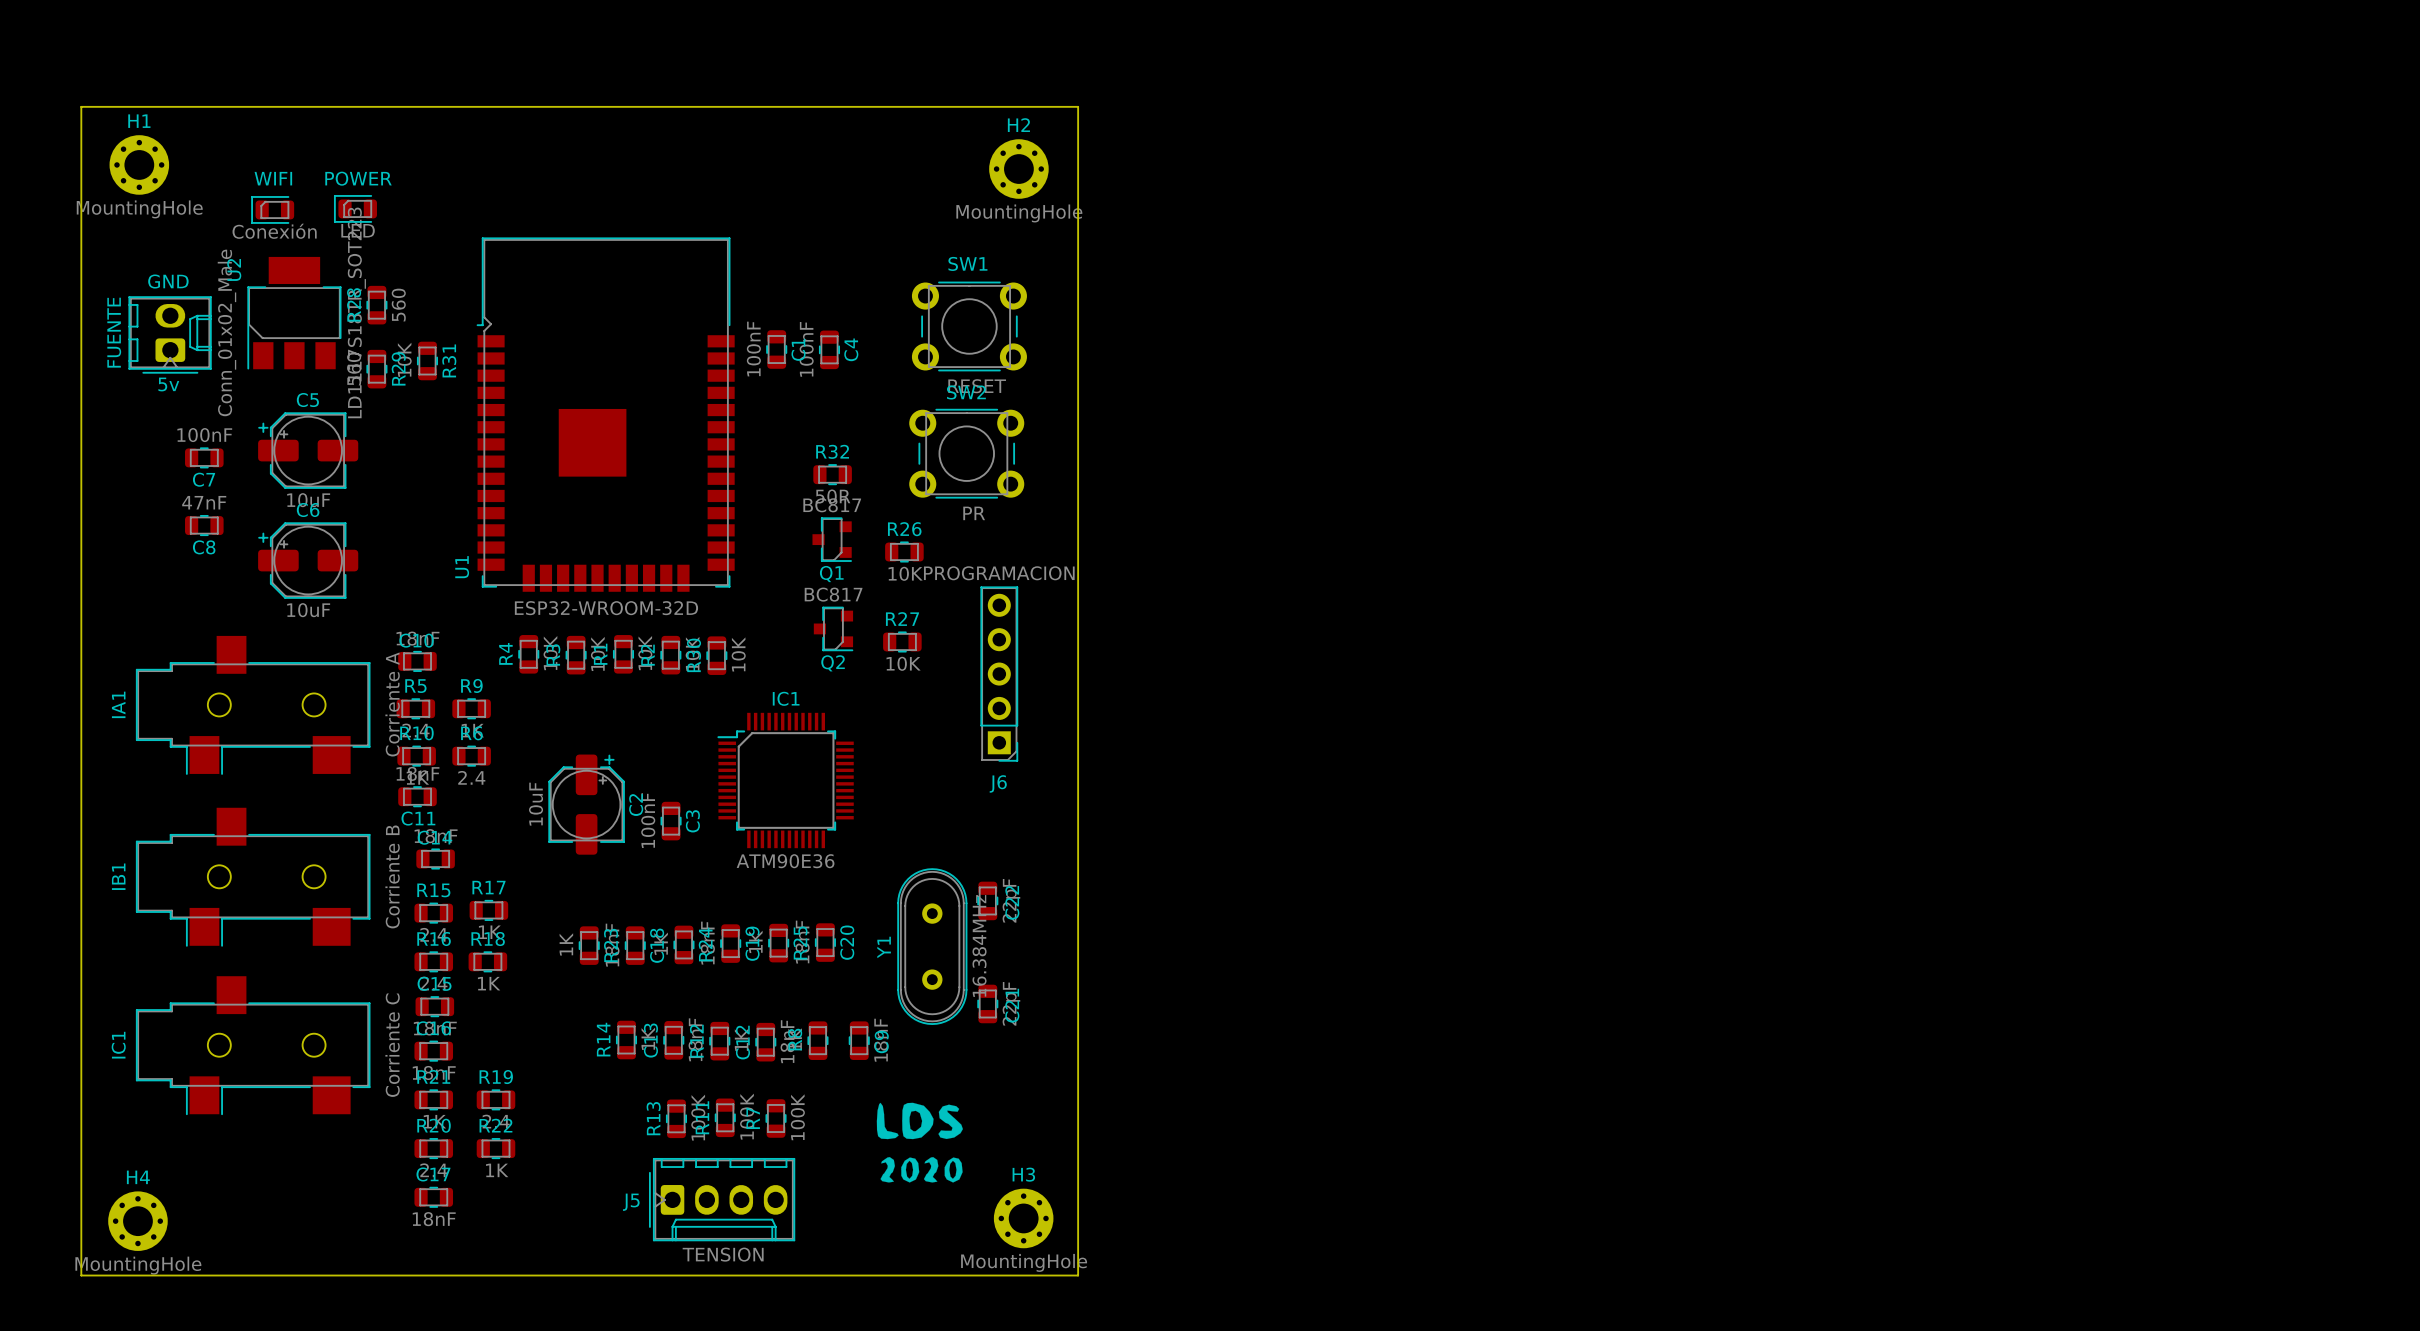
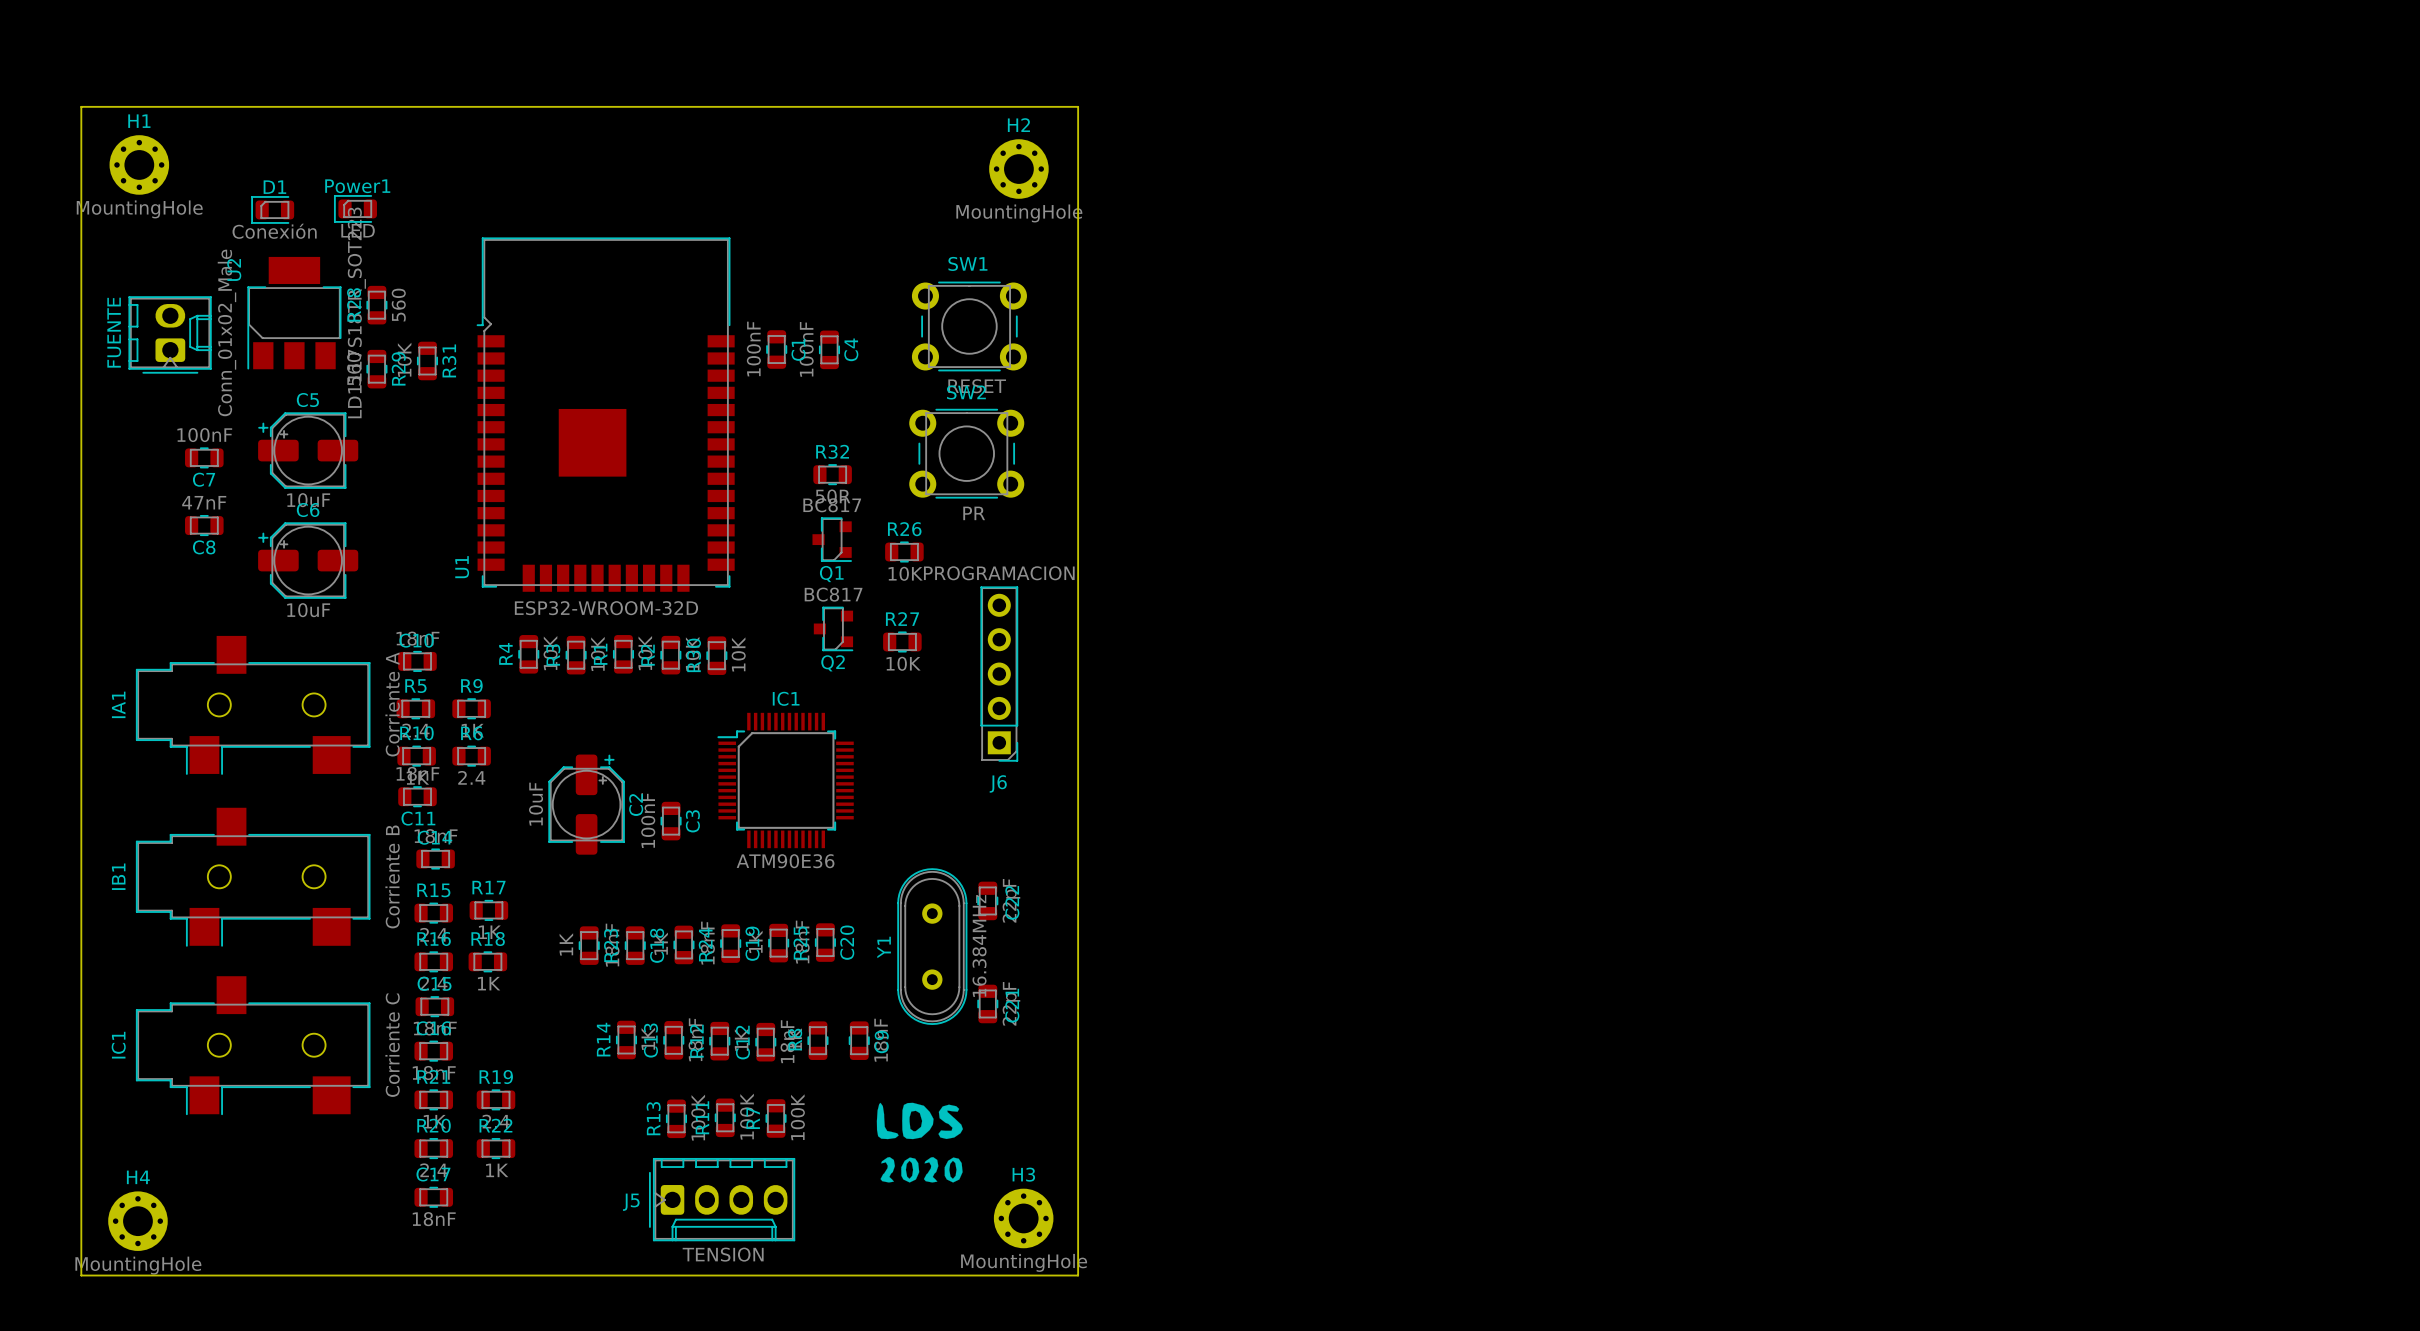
WIFI name: WIFI (273, 178) -> D1 (274, 187)
POWER name: POWER (358, 178) -> Power1 (357, 186)
text: GND (168, 281) -> none
text: 5v (168, 384) -> none

